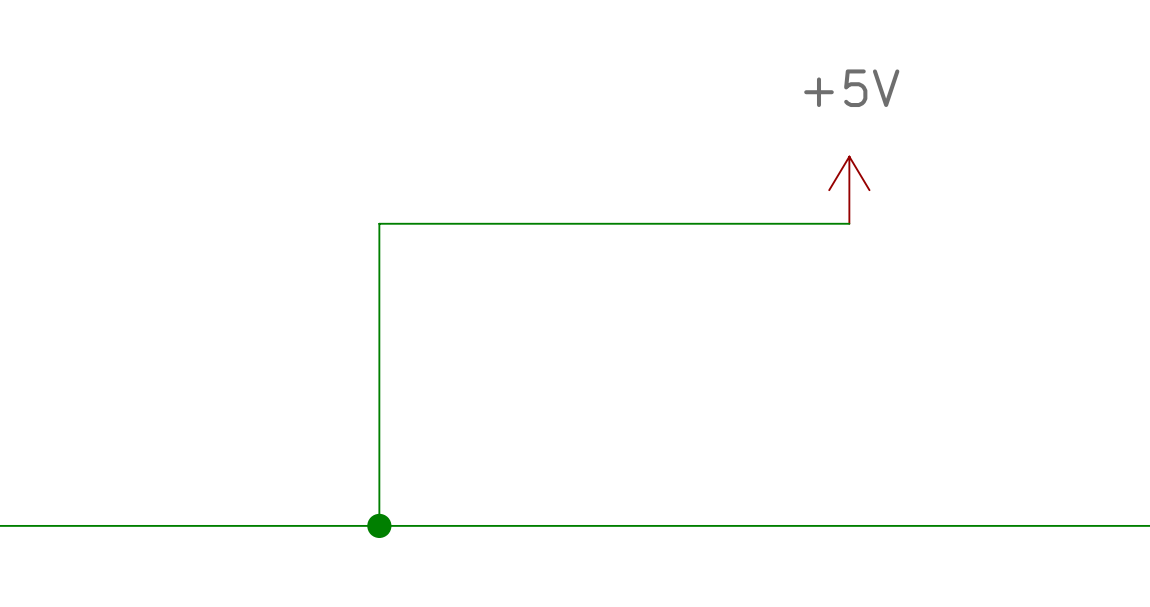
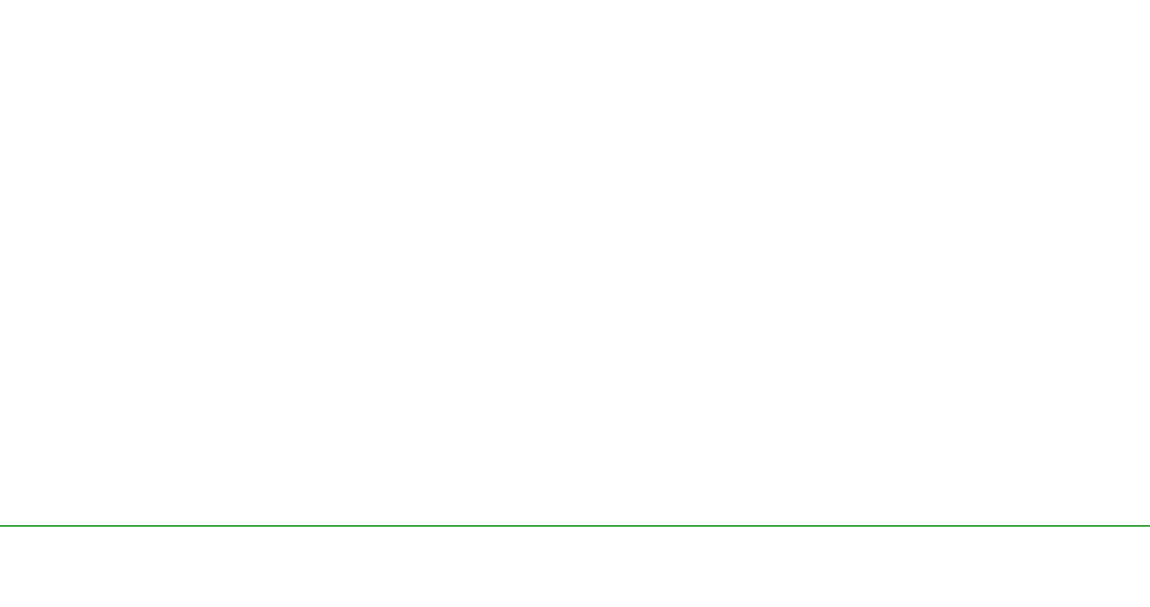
power symbol: +5V (849, 190) -> none
wire: (849, 223) (379, 223) (379, 525) -> none
junction: (379, 525) -> none

